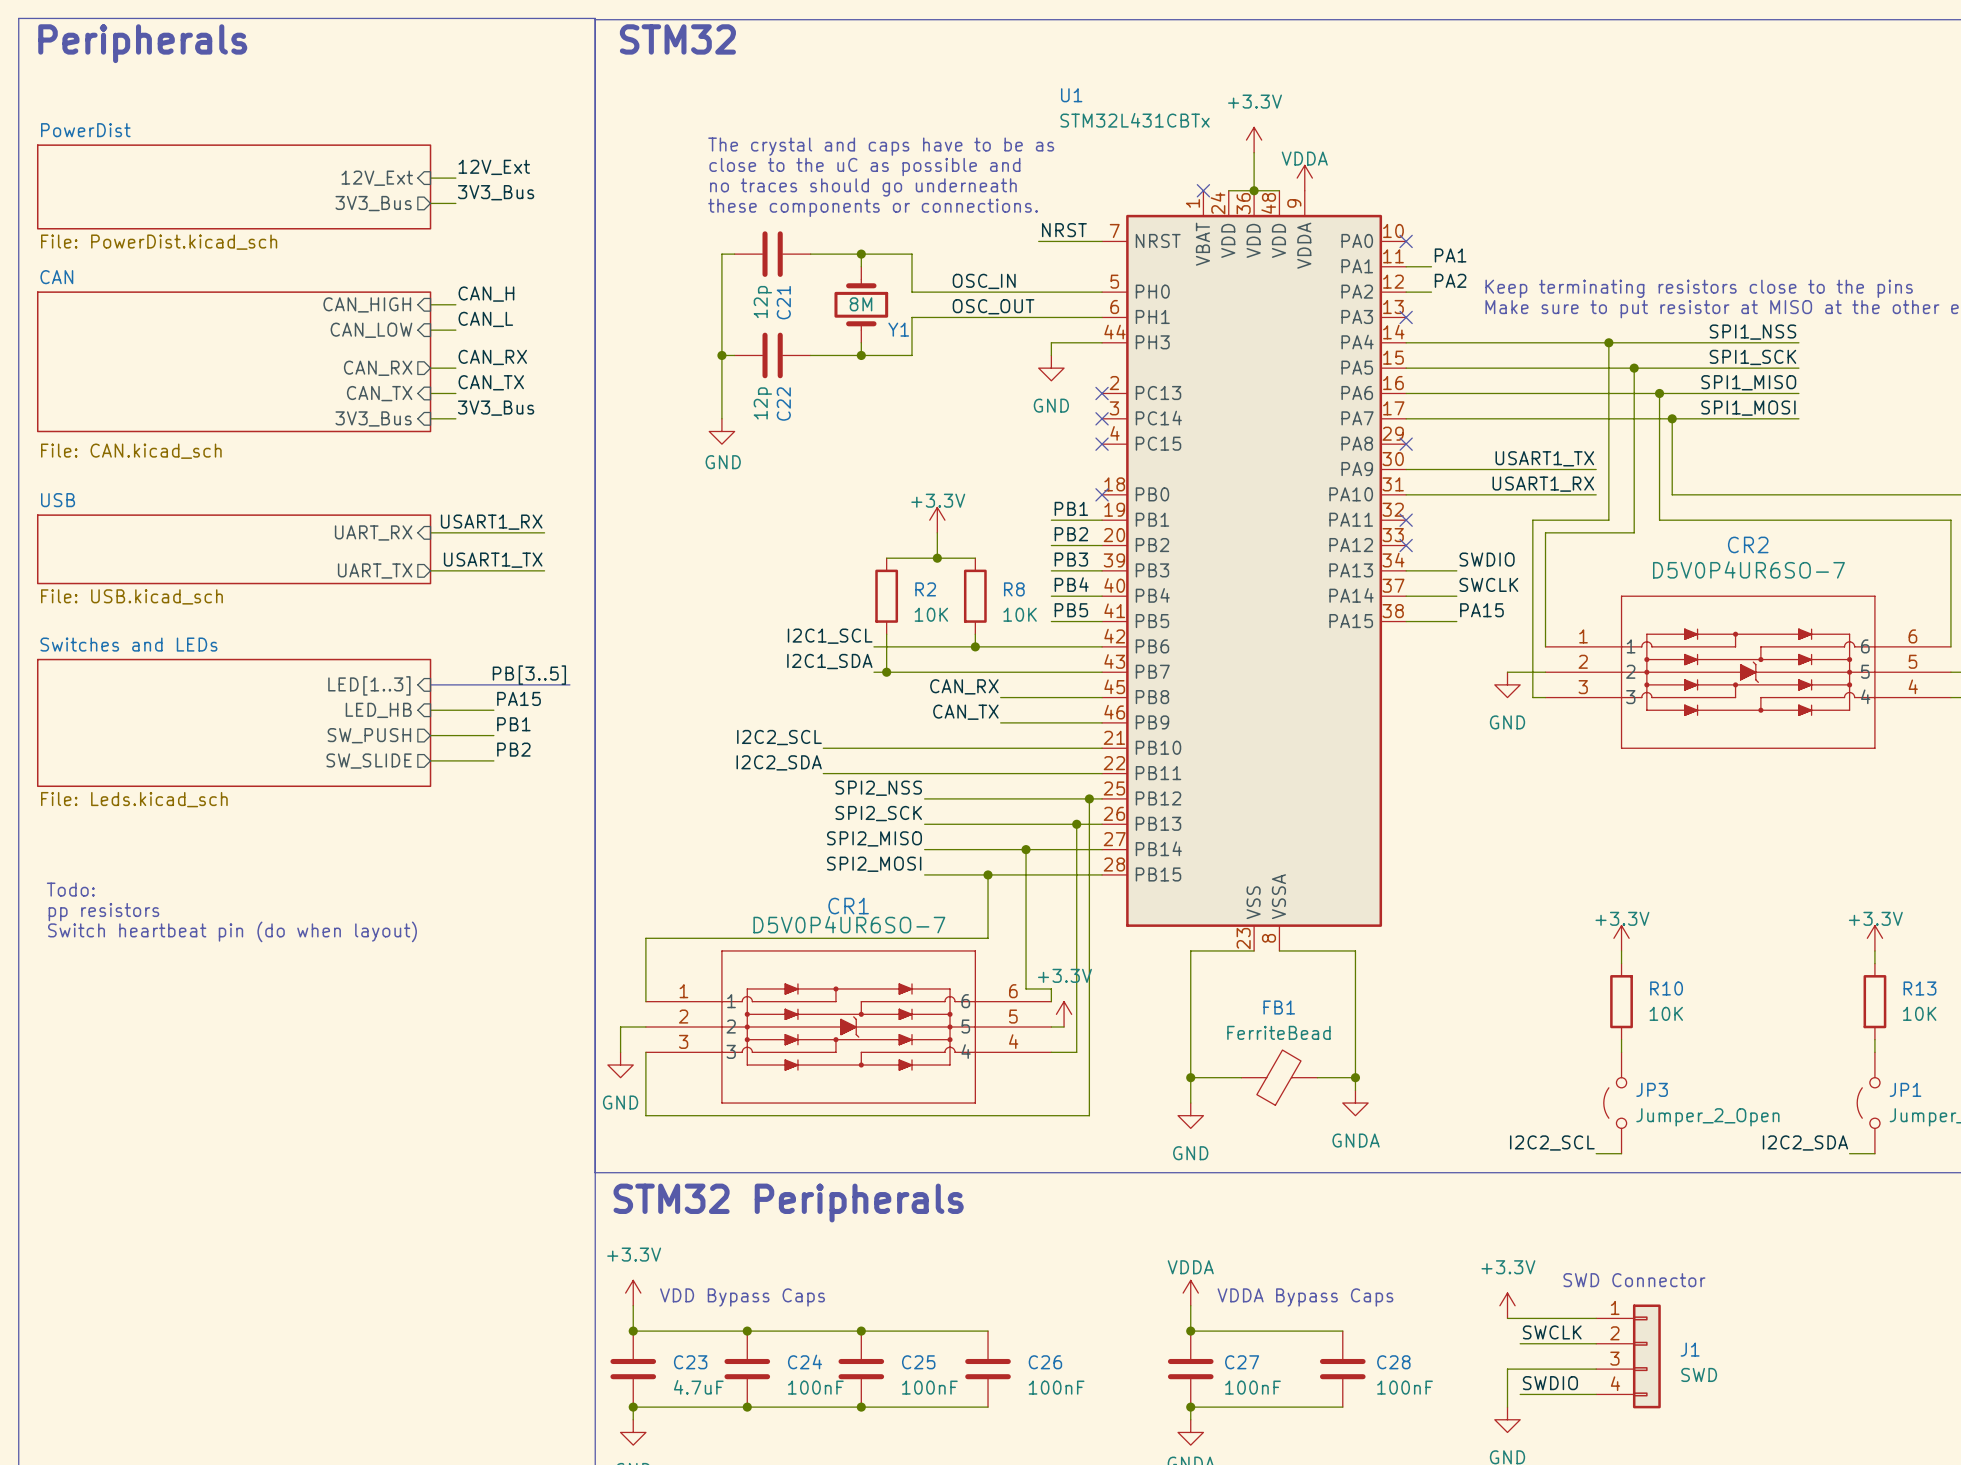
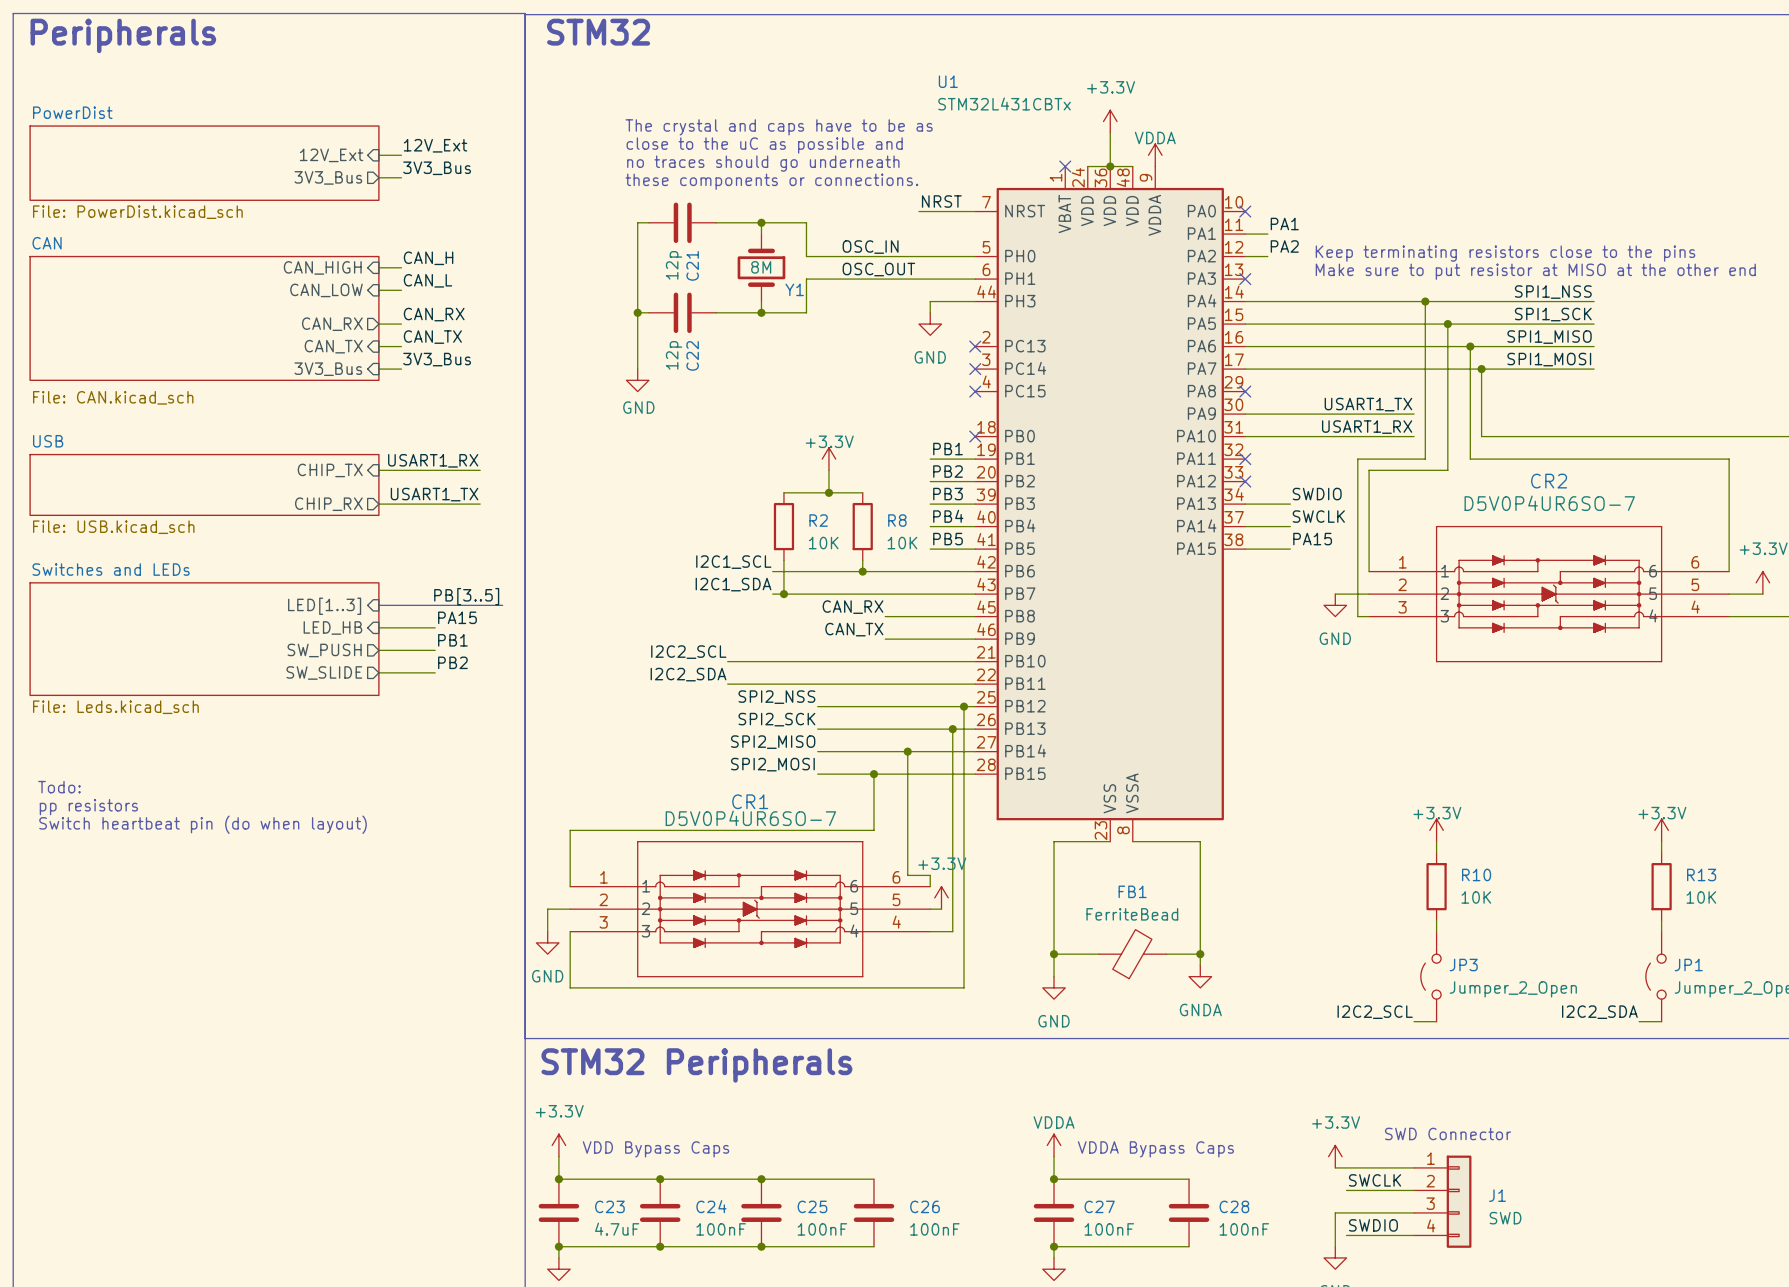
sheet pin: UART_RX (373, 532) -> CHIP_TX (330, 470)
sheet pin: UART_TX (375, 570) -> CHIP_RX (328, 504)

